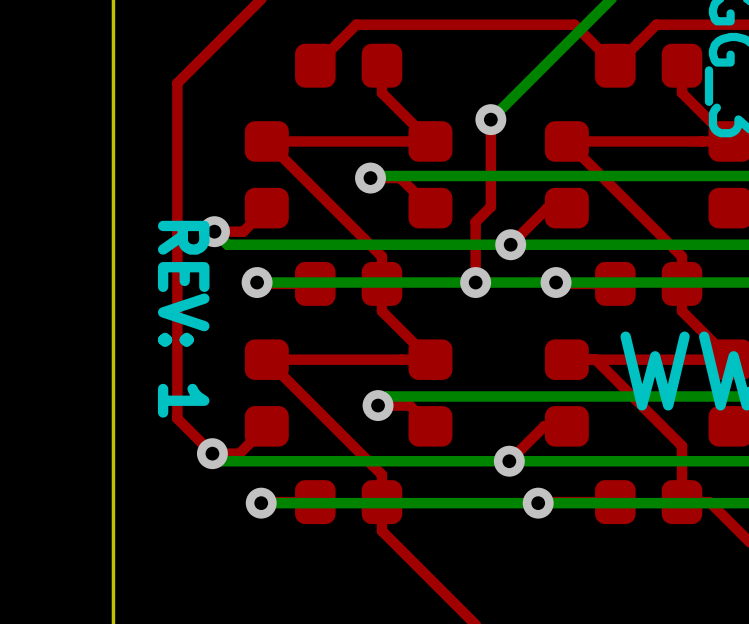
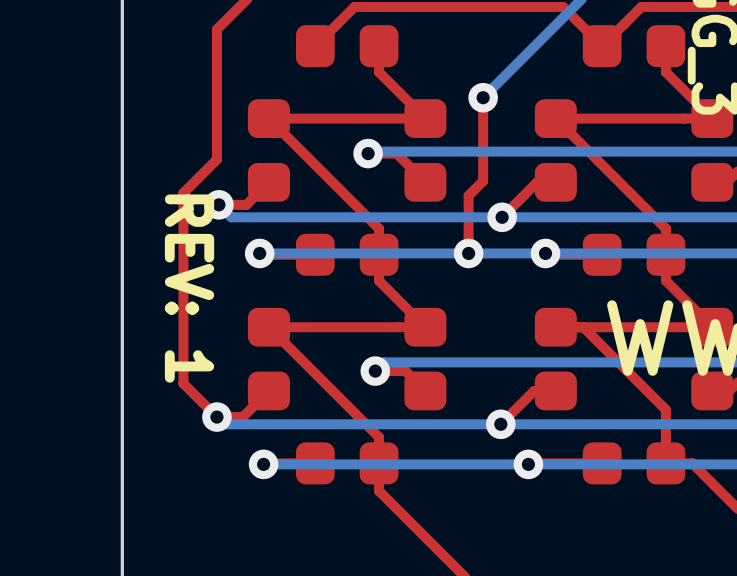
top track: (212, 48) (177, 83) (177, 219) -> (216, 29) (216, 159) (183, 193)

